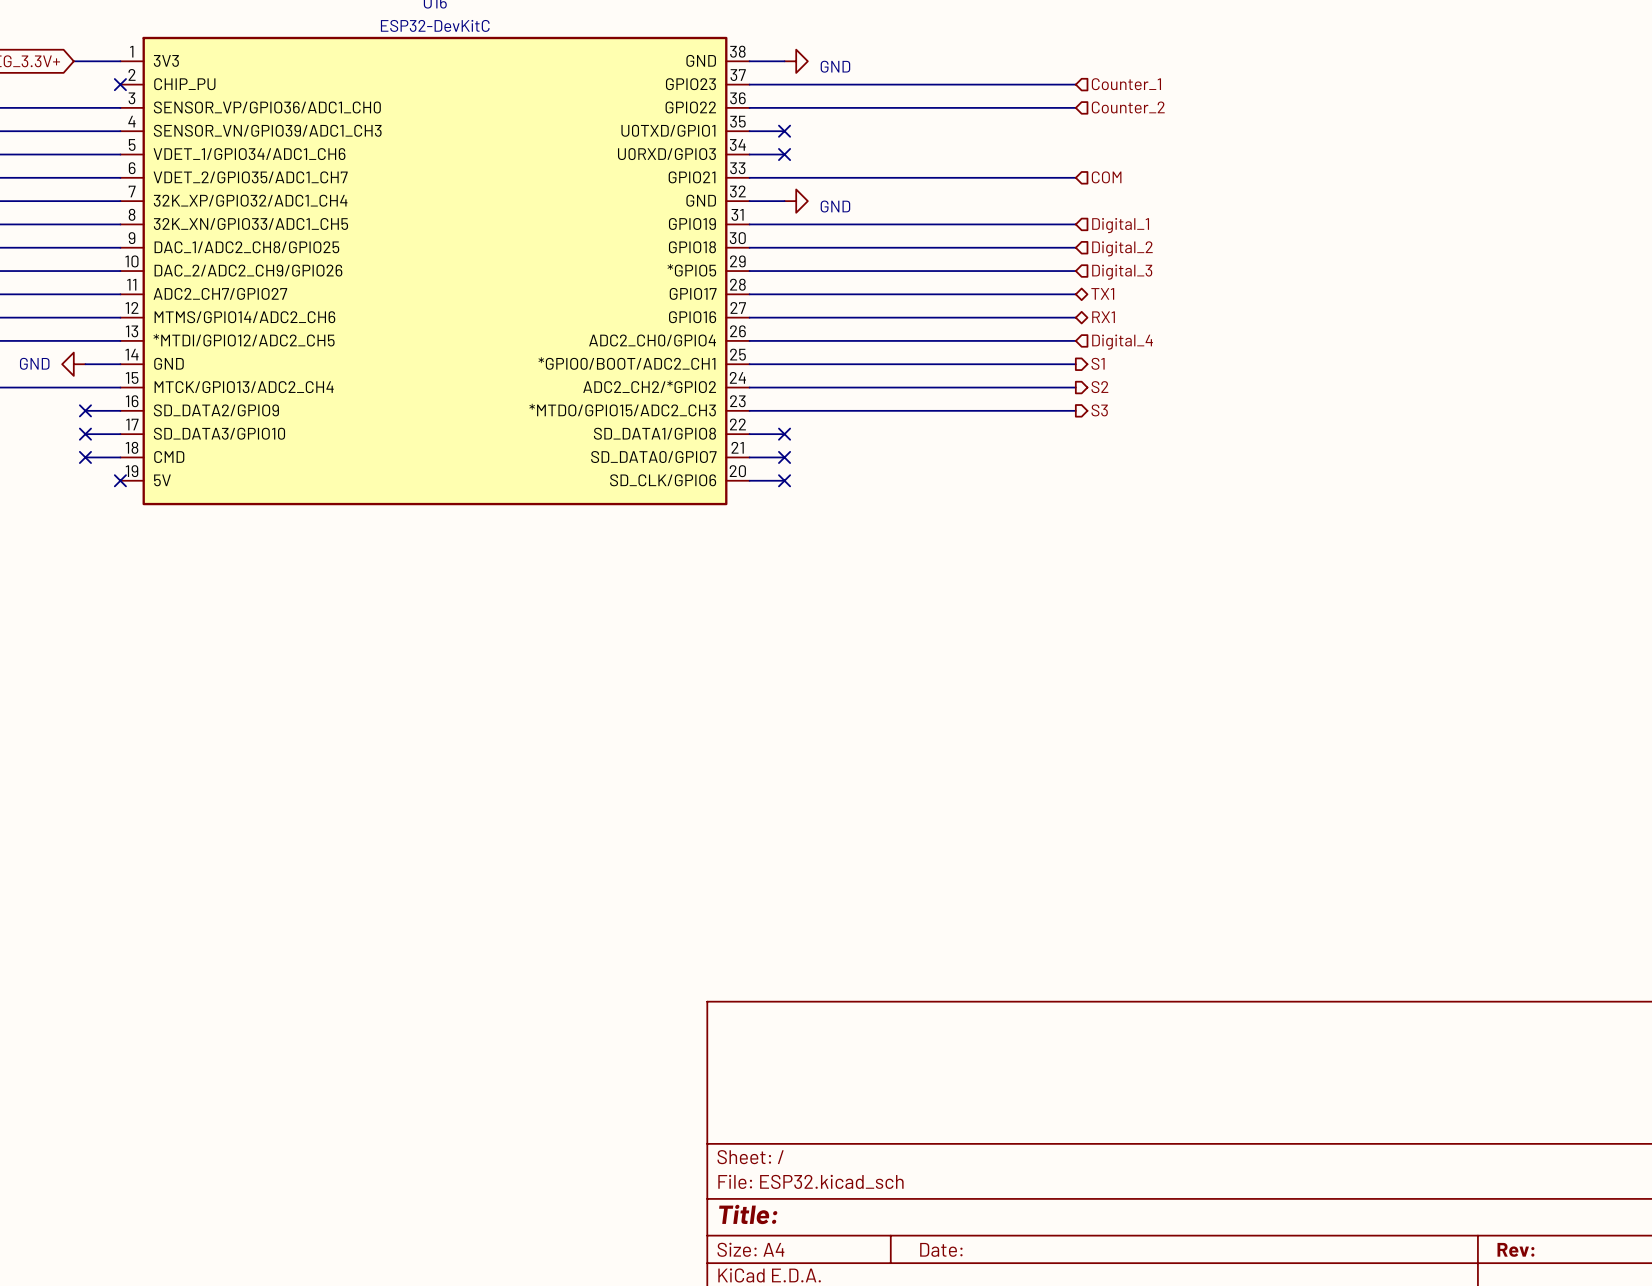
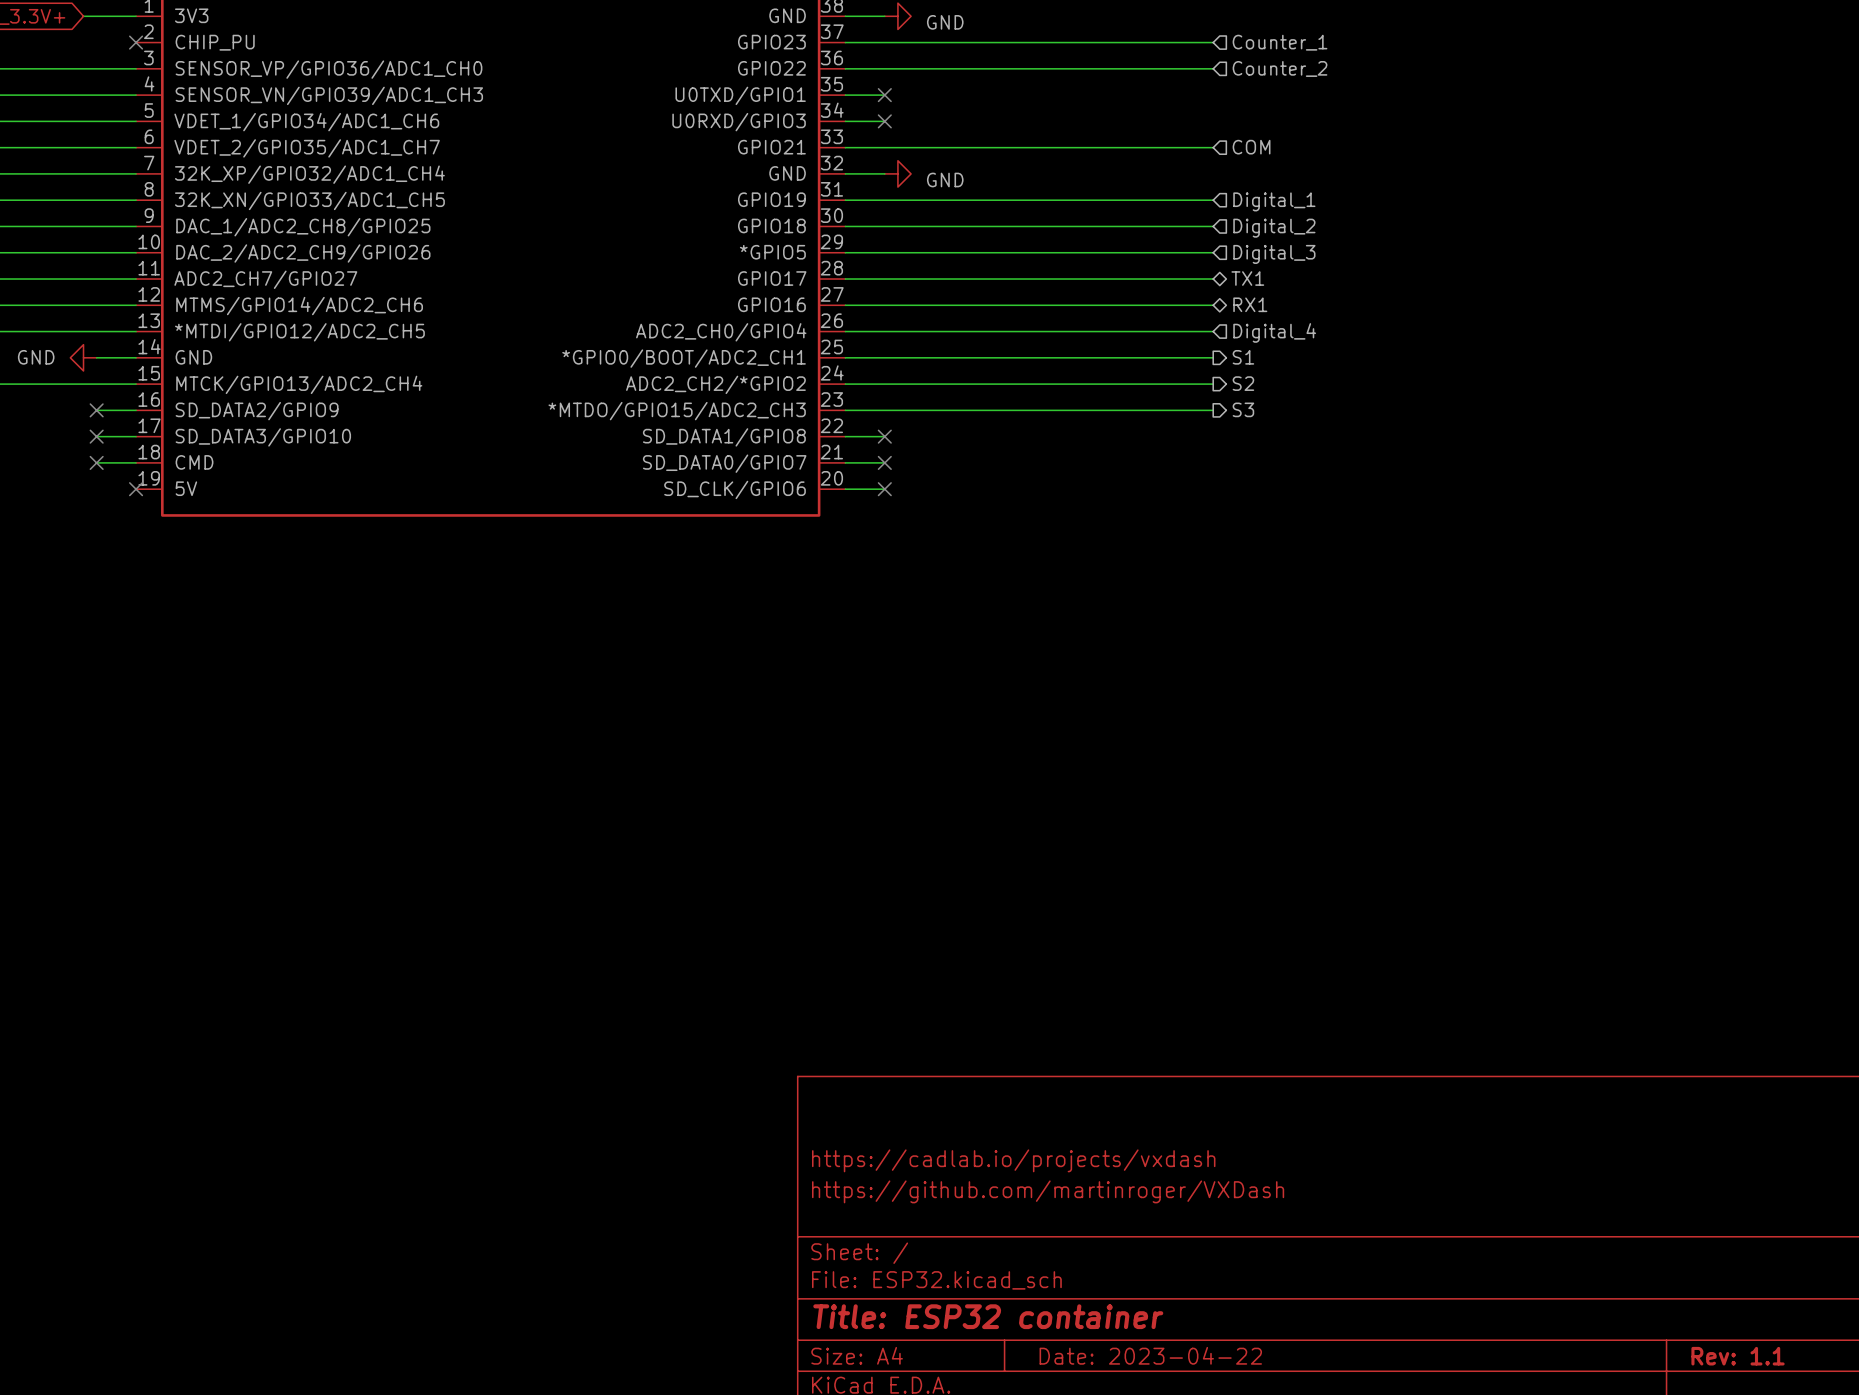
title block: none -> https://cadlab.io/projects/vxdash (1013, 1160)
title block: none -> https://github.com/martinroger/VXDash (1048, 1191)
title block: Title: (748, 1214) -> Title: ESP32 container (988, 1316)
title block: Date: (941, 1249) -> Date: 2023-04-22 (1150, 1355)
title block: Rev: (1515, 1249) -> Rev: 1.1 (1738, 1356)

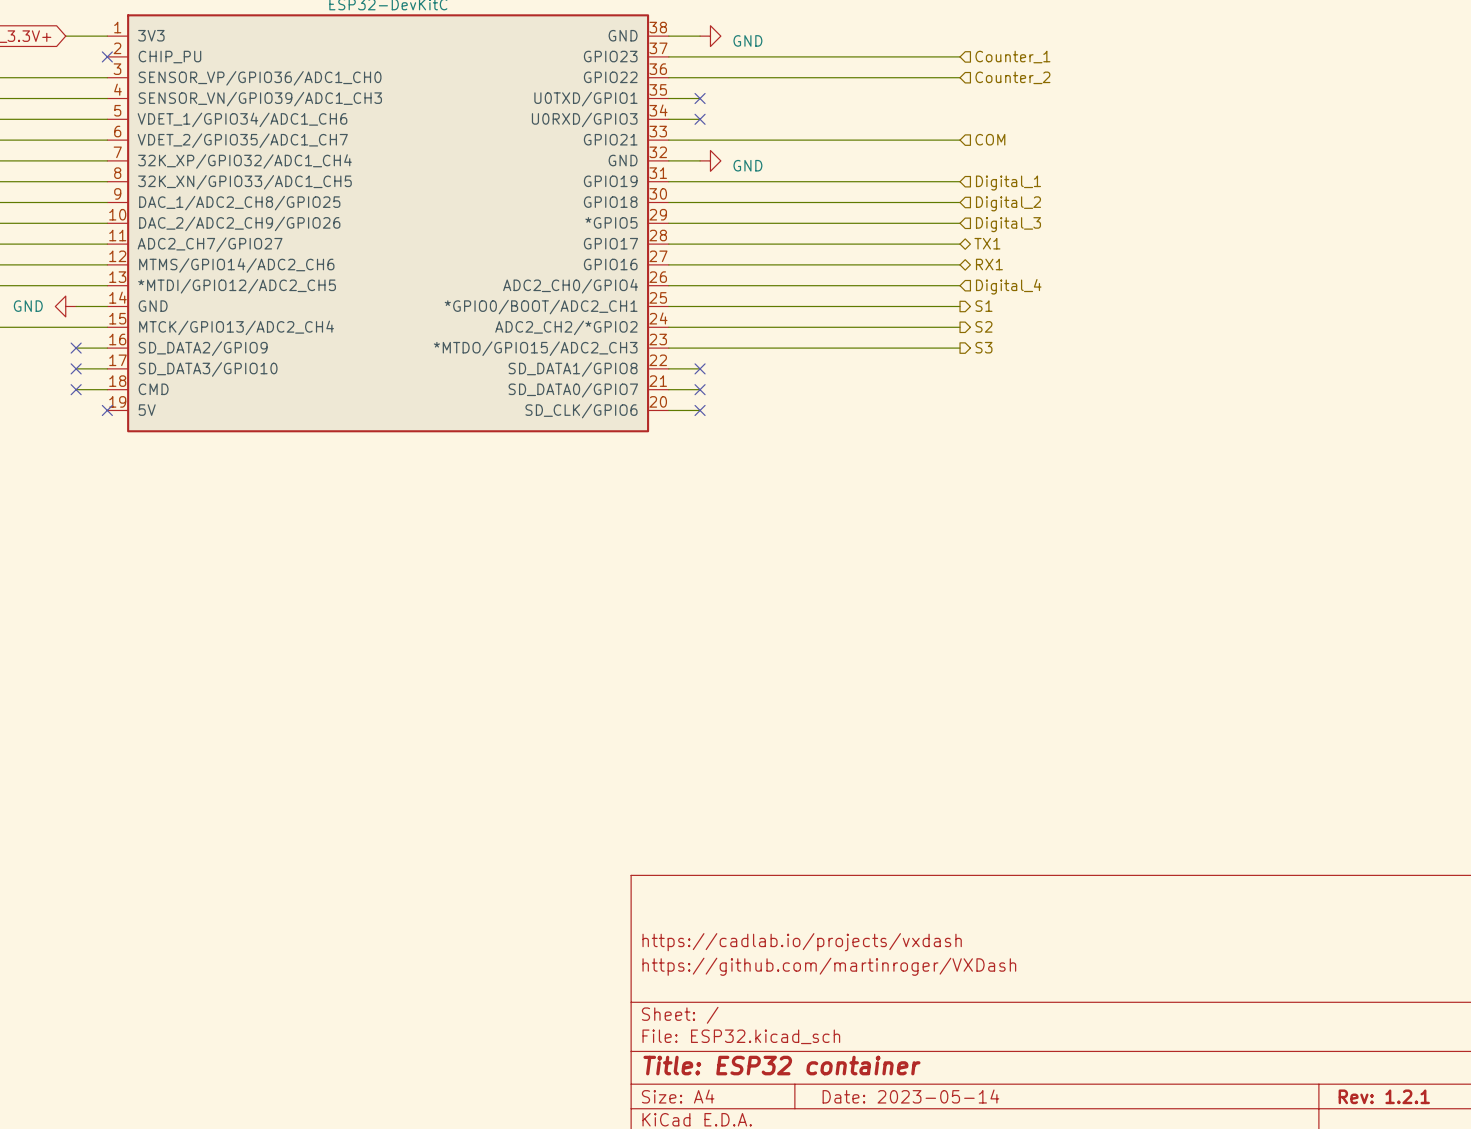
title block: Date: 2023-04-22 (1150, 1355) -> Date: 2023-05-14 (910, 1096)
title block: Rev: 1.1 (1738, 1356) -> Rev: 1.2.1 (1384, 1096)

